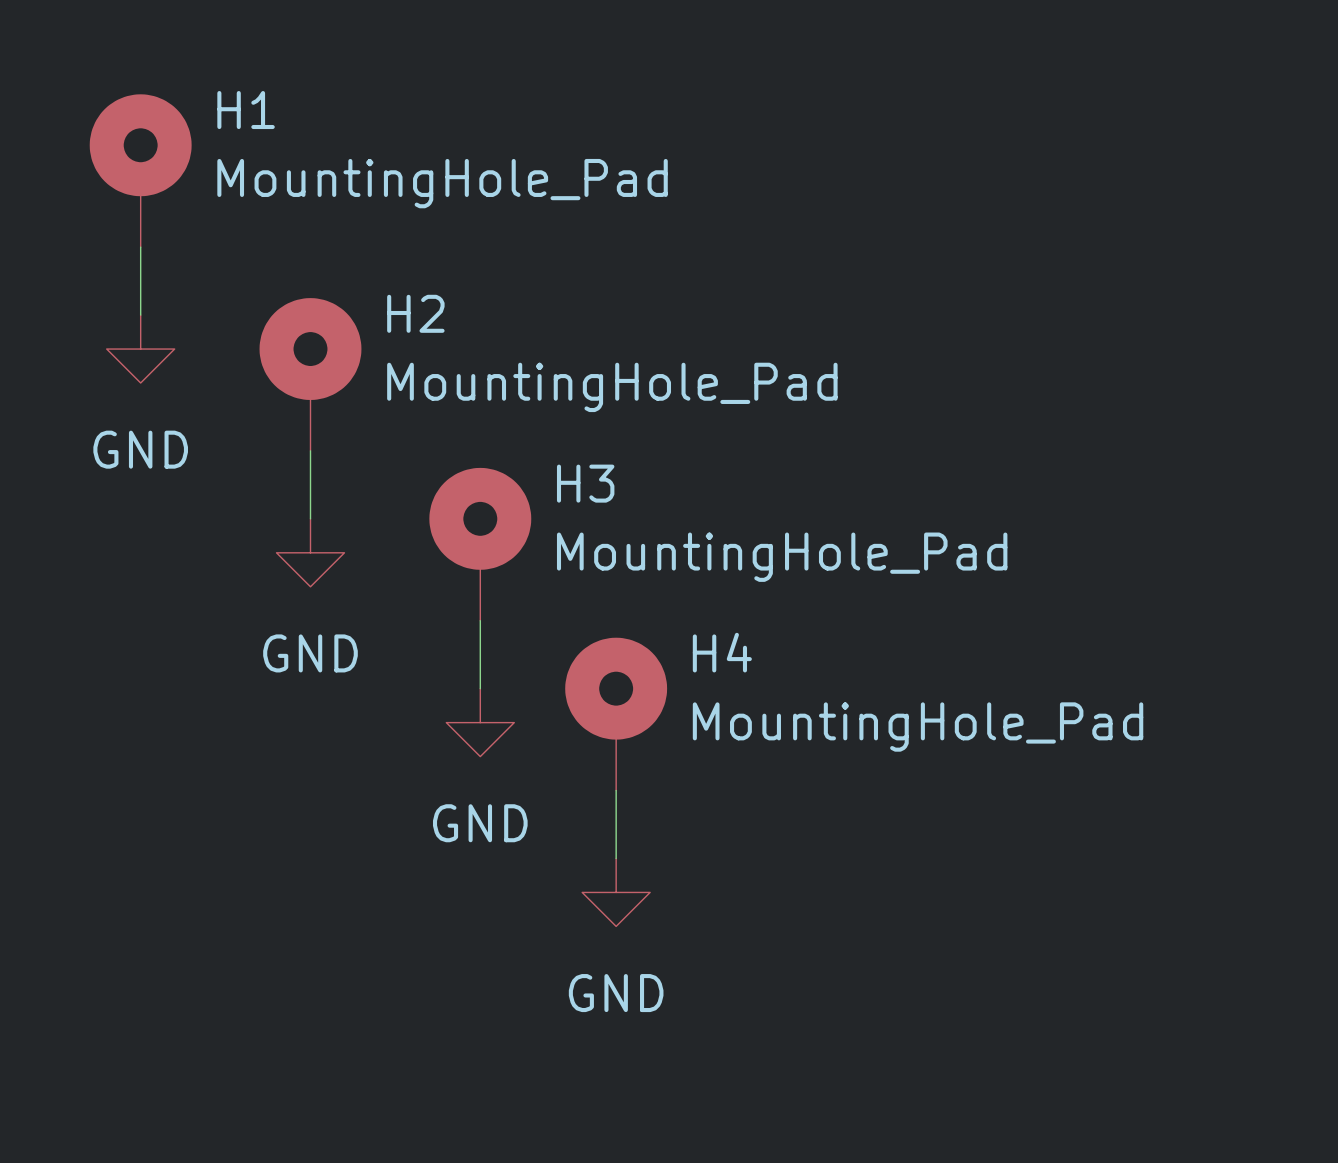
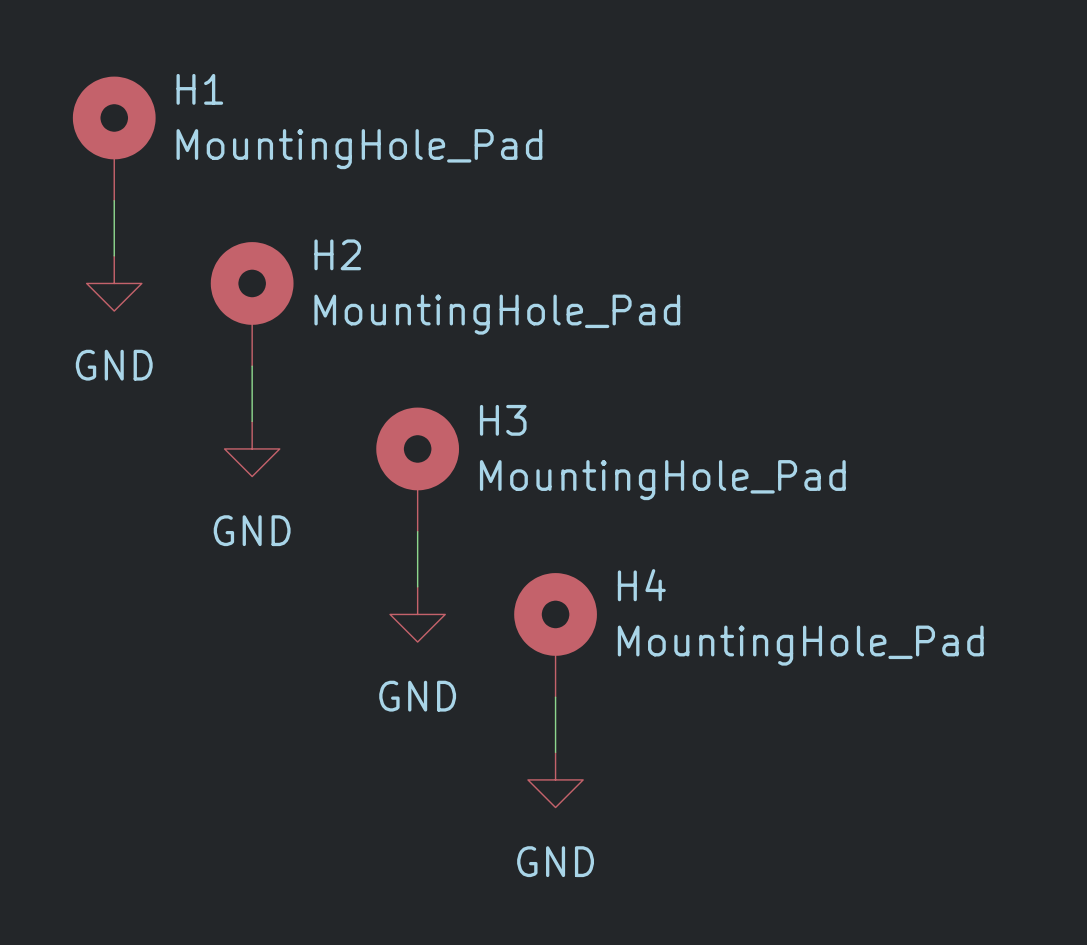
H3 position: (480, 544) -> (417, 469)
wire: (480, 620) (480, 688) -> (417, 531) (417, 586)
H4 position: (616, 714) -> (555, 635)
power symbol position: GND (480, 722) -> GND (417, 614)
wire: (616, 790) (616, 858) -> (555, 697) (555, 752)
power symbol: GND (616, 892) -> none
power symbol: none -> GND (555, 779)

